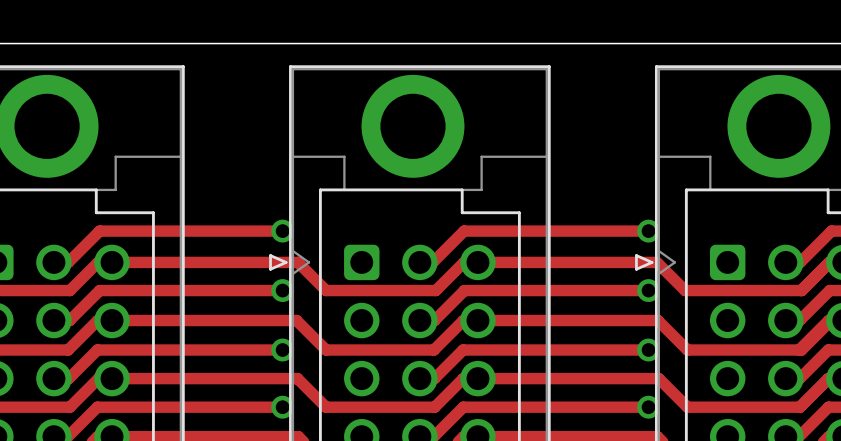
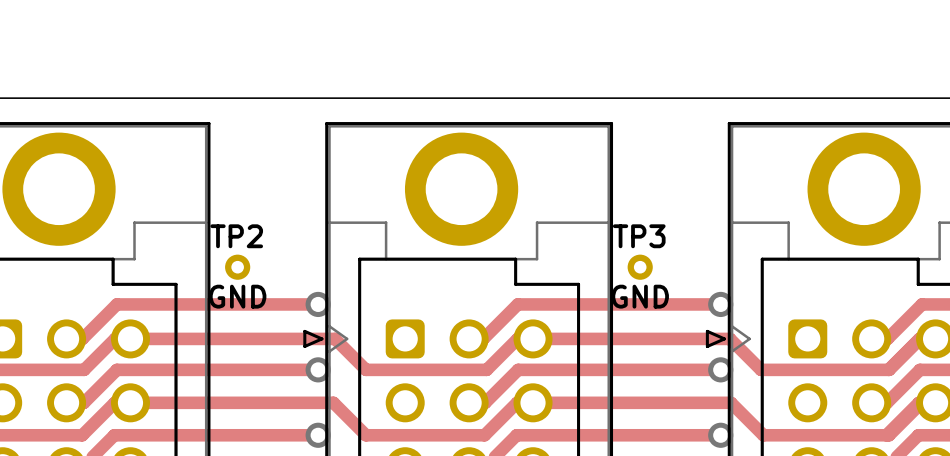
TP2: none -> GND (237, 267)
TP3: none -> GND (640, 267)

